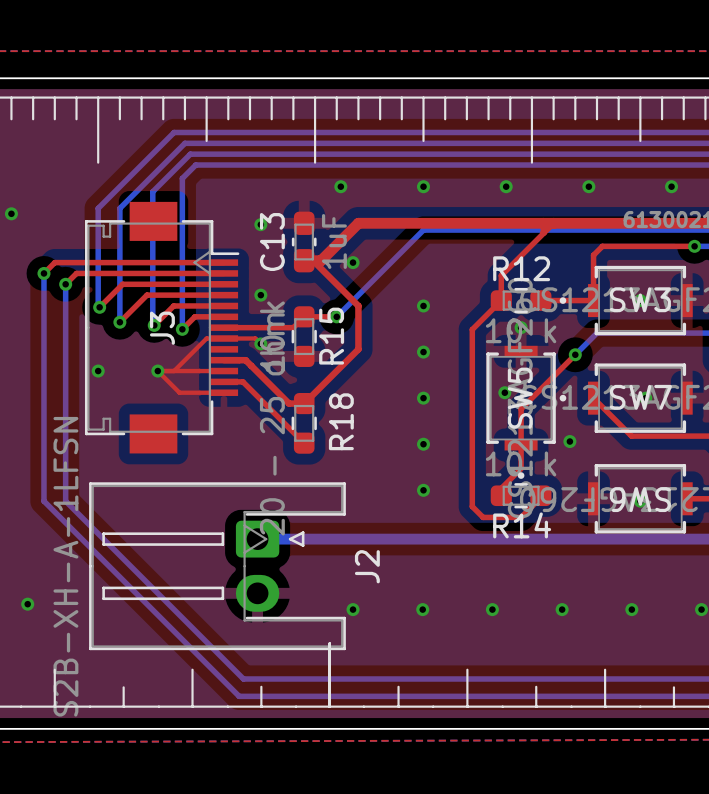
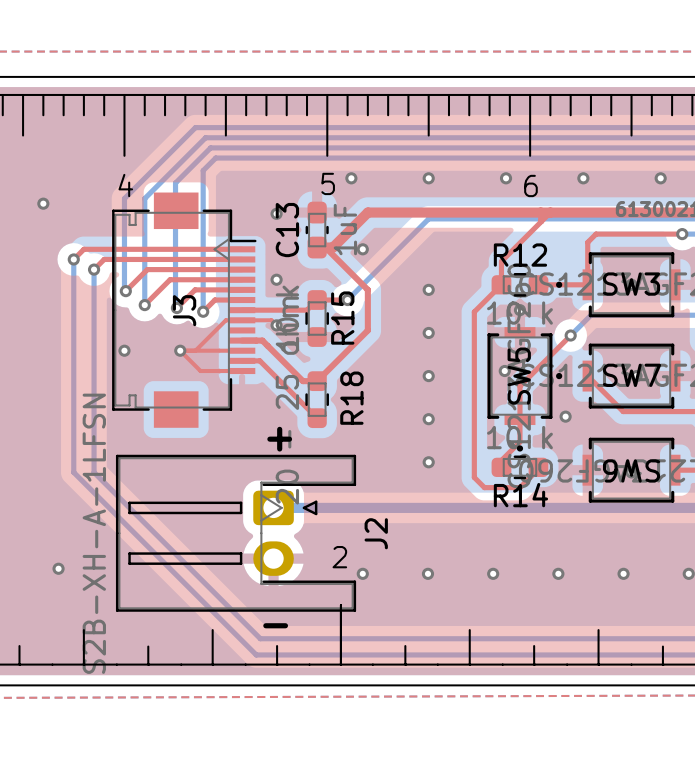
text: none -> 5 (328, 183)
text: none -> 4 (125, 185)
text: none -> 6 (530, 185)
text: none -> + (279, 439)
text: none -> 2 (339, 557)
text: none -> - (275, 625)

